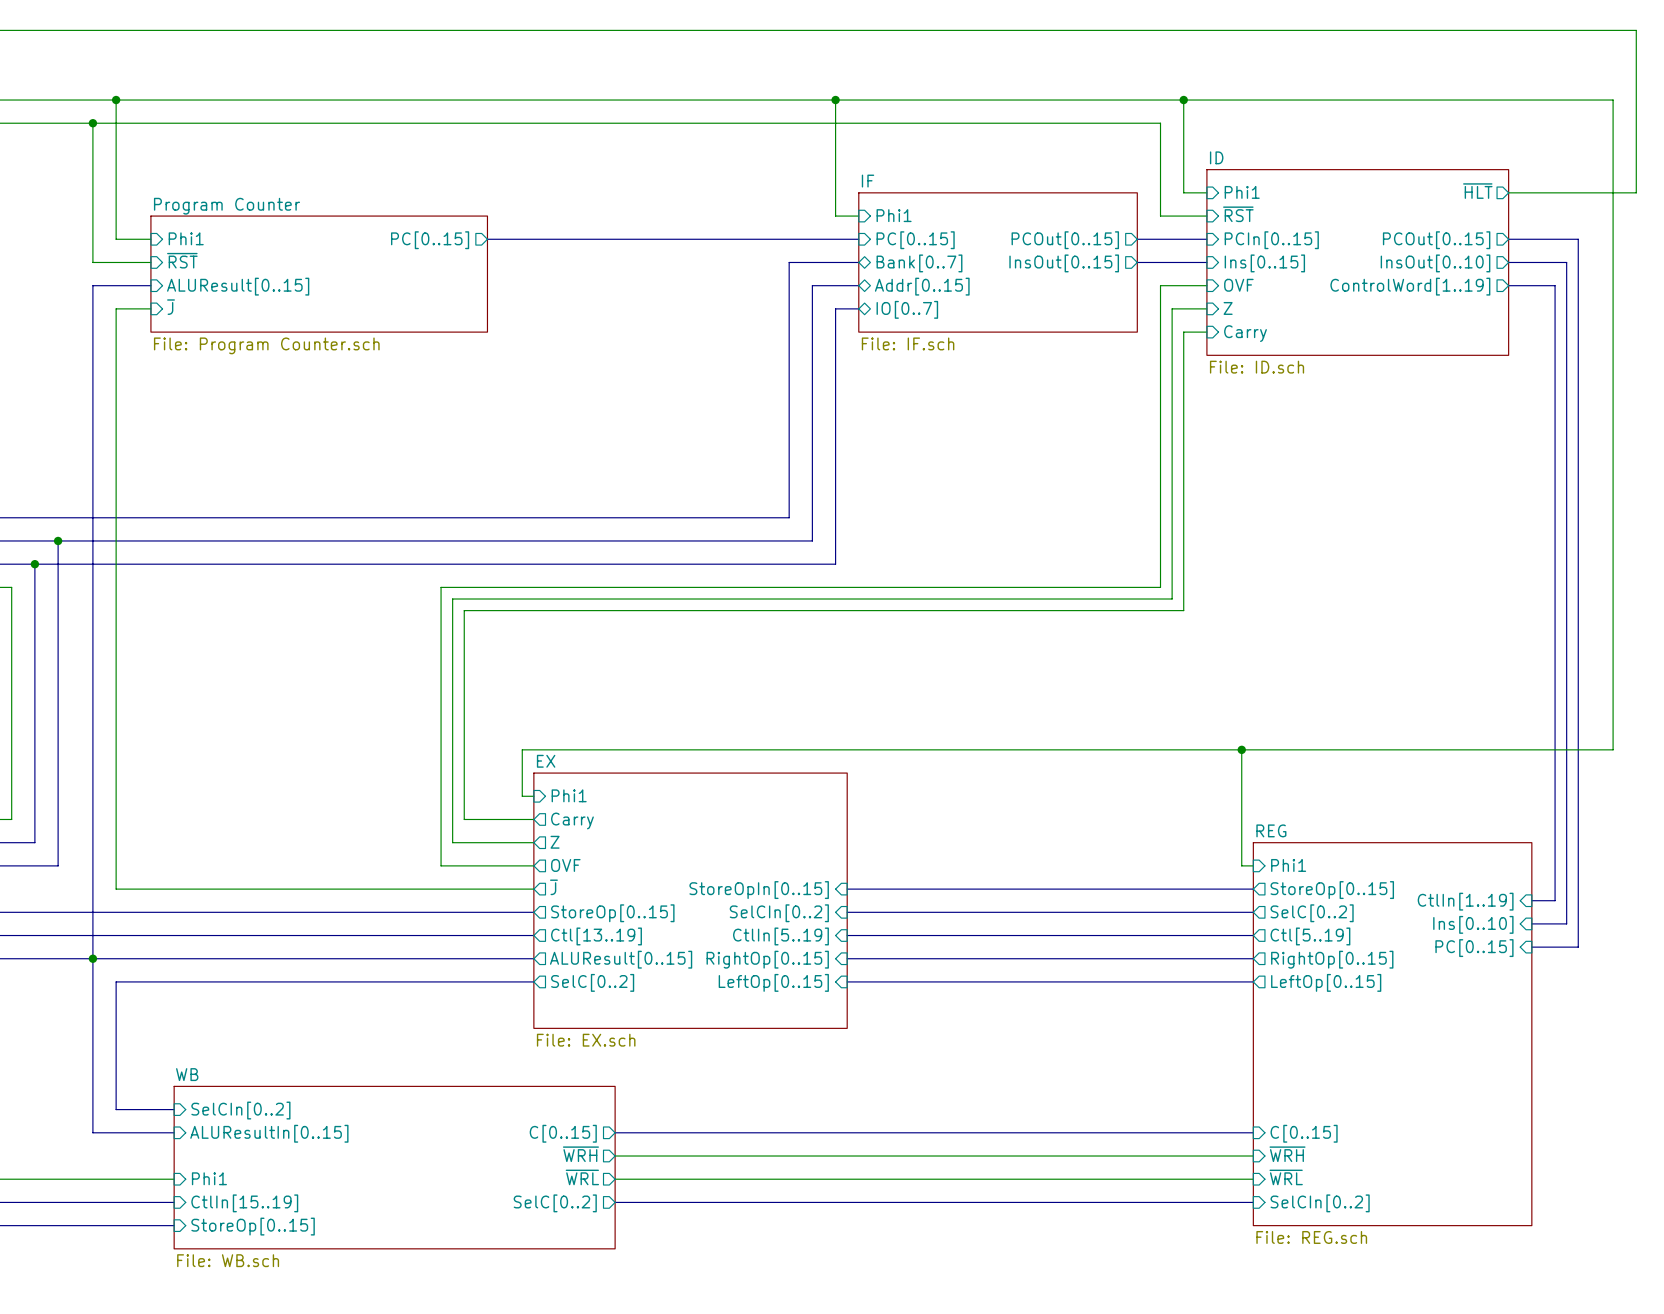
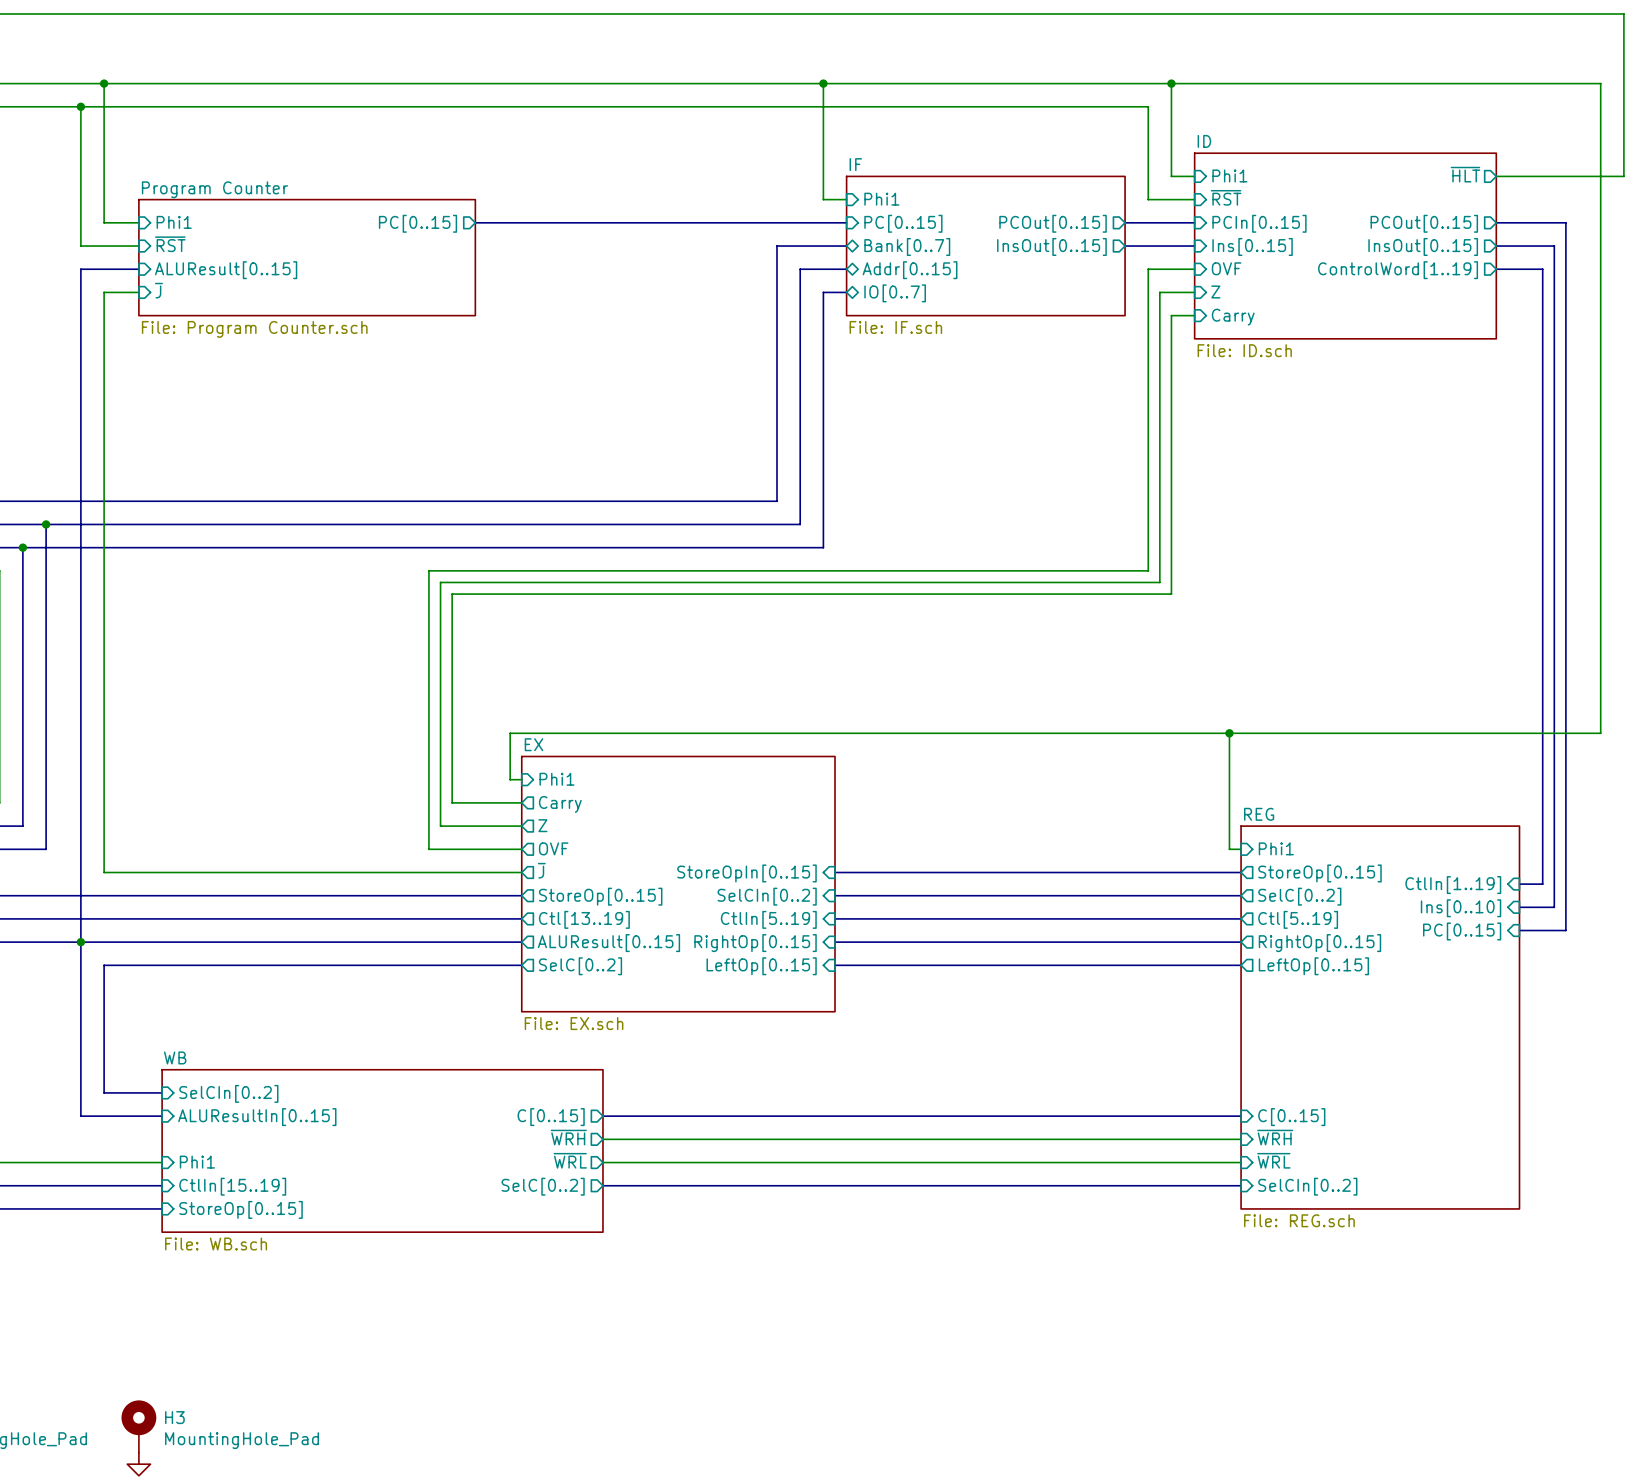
sheet pin: InsOut[0..10] (1435, 263) -> InsOut[0..15] (1423, 246)

